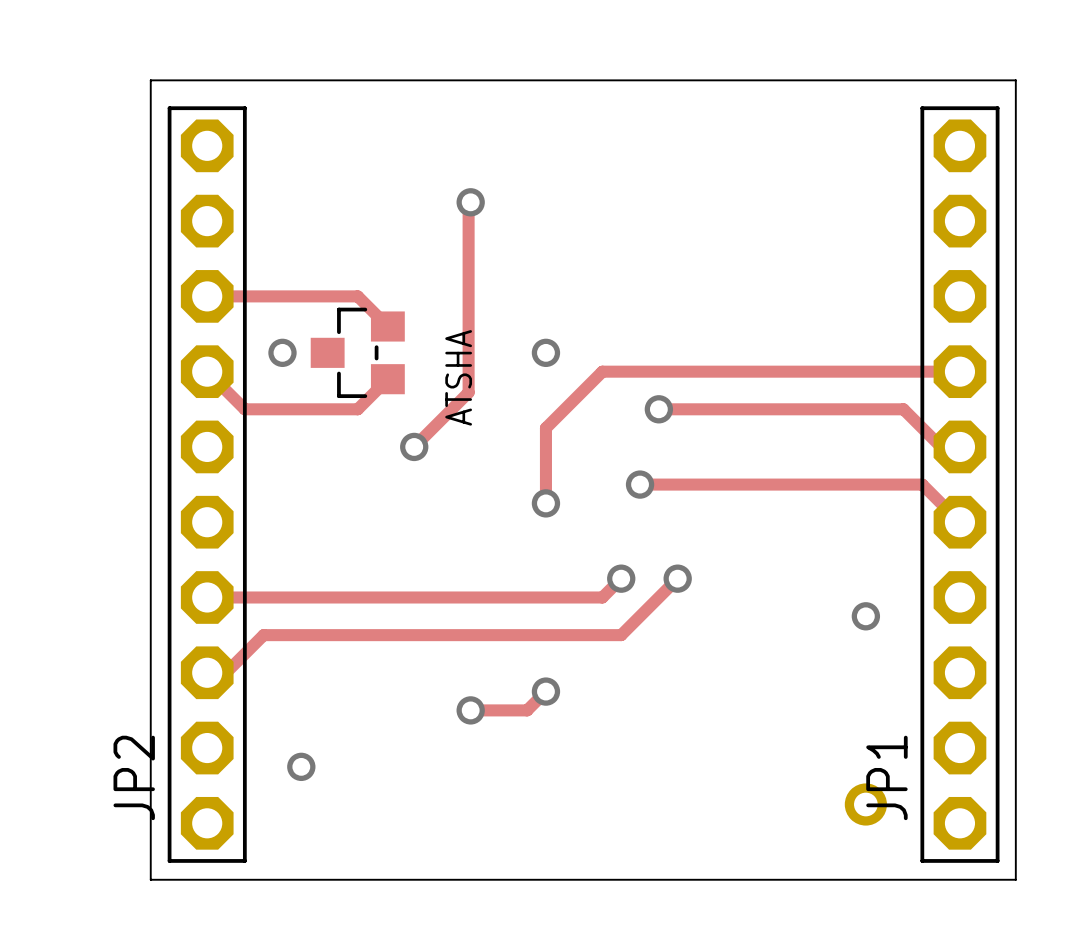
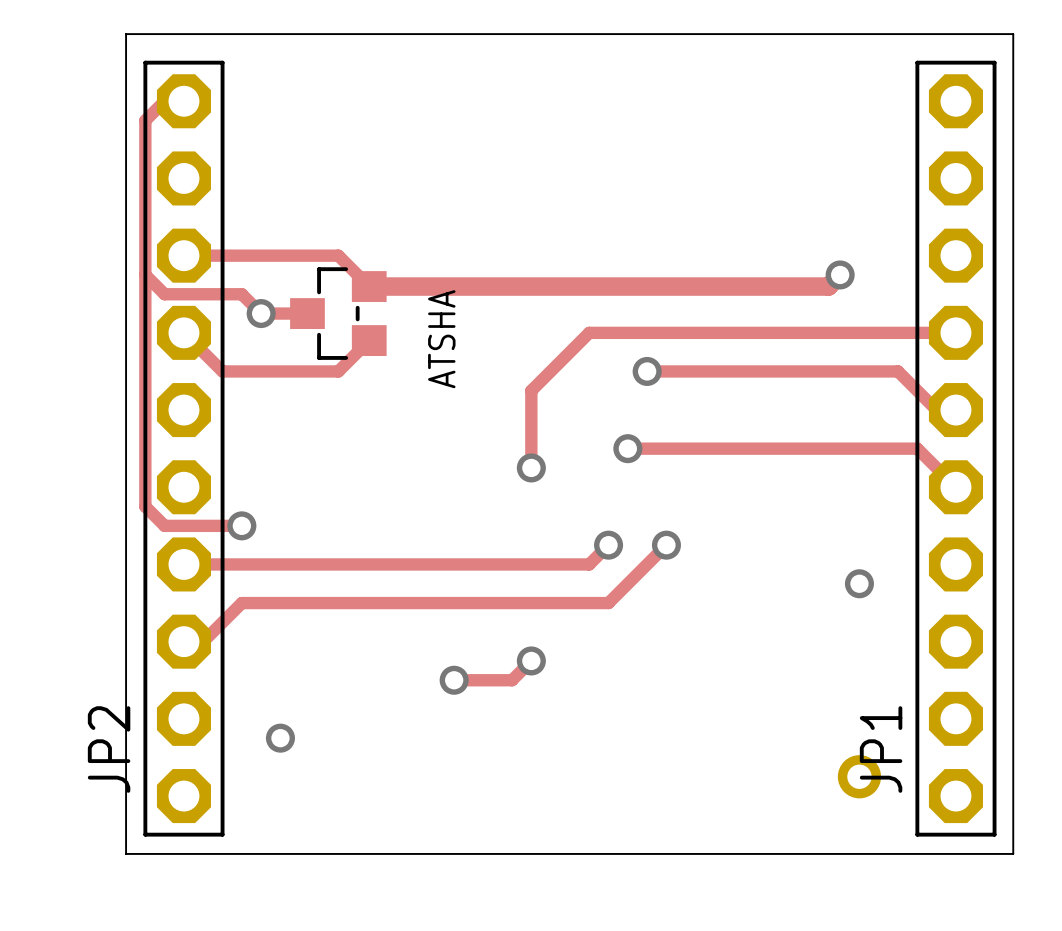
track: none -> (183, 101) (164, 101) (145, 120) (145, 506) (164, 525) (241, 525)
track: (470, 202) (468, 204) (468, 392) (414, 446) -> none
via: (470, 202) -> none
track: none -> (145, 274) (164, 294) (241, 294) (261, 313) (307, 313)
track: none -> (840, 274) (828, 286) (369, 286)
via: none -> (840, 274)
via: (545, 352) -> none
via: (414, 446) -> none
via: none -> (241, 525)

